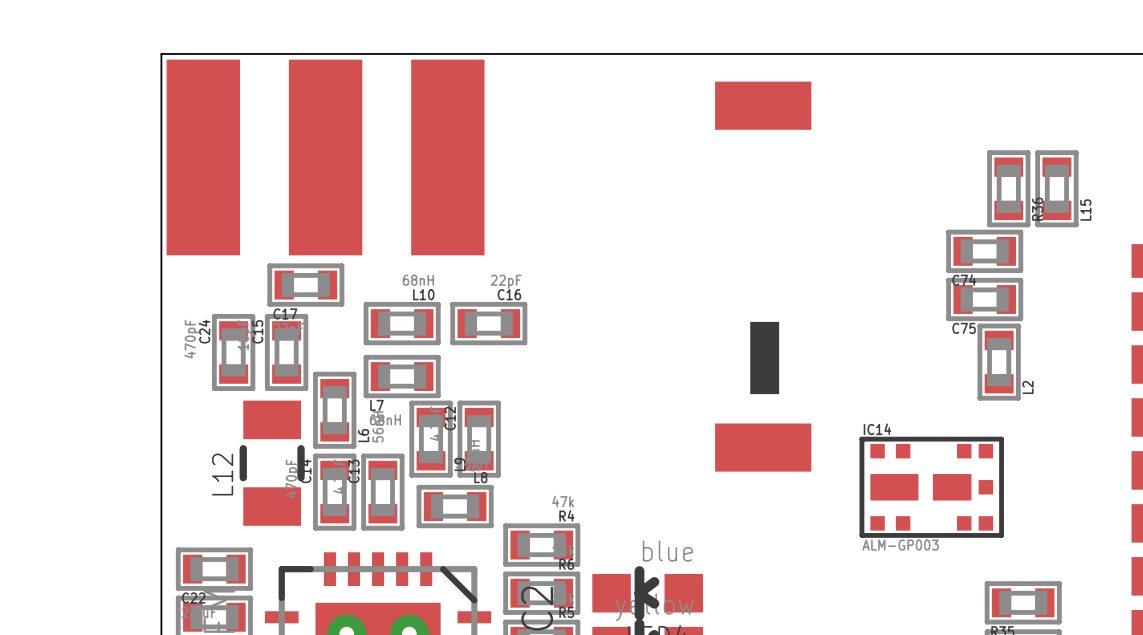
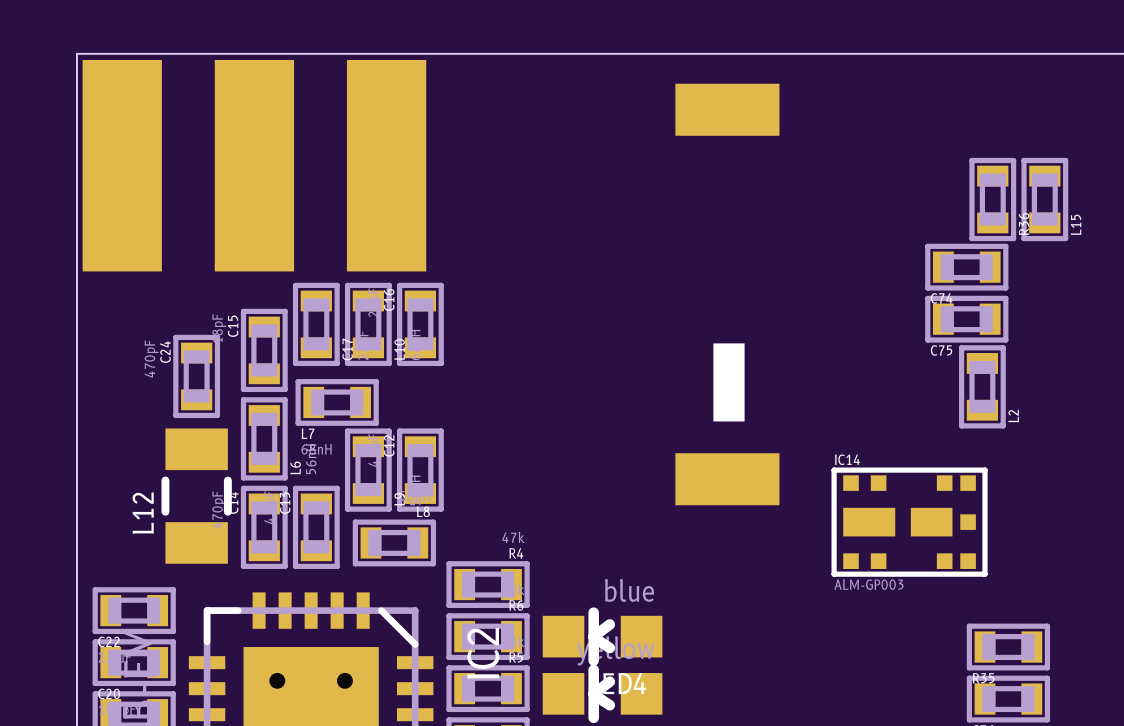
C17 rotation: 0° (305, 285) -> 90° clockwise (316, 324)
C17 position: (305, 285) -> (316, 324)
L10 rotation: 0° (402, 323) -> 90° clockwise (368, 324)
C16 rotation: 0° (488, 323) -> 90° clockwise (420, 324)
C24 position: (233, 352) -> (196, 376)
C15 position: (286, 352) -> (264, 350)

